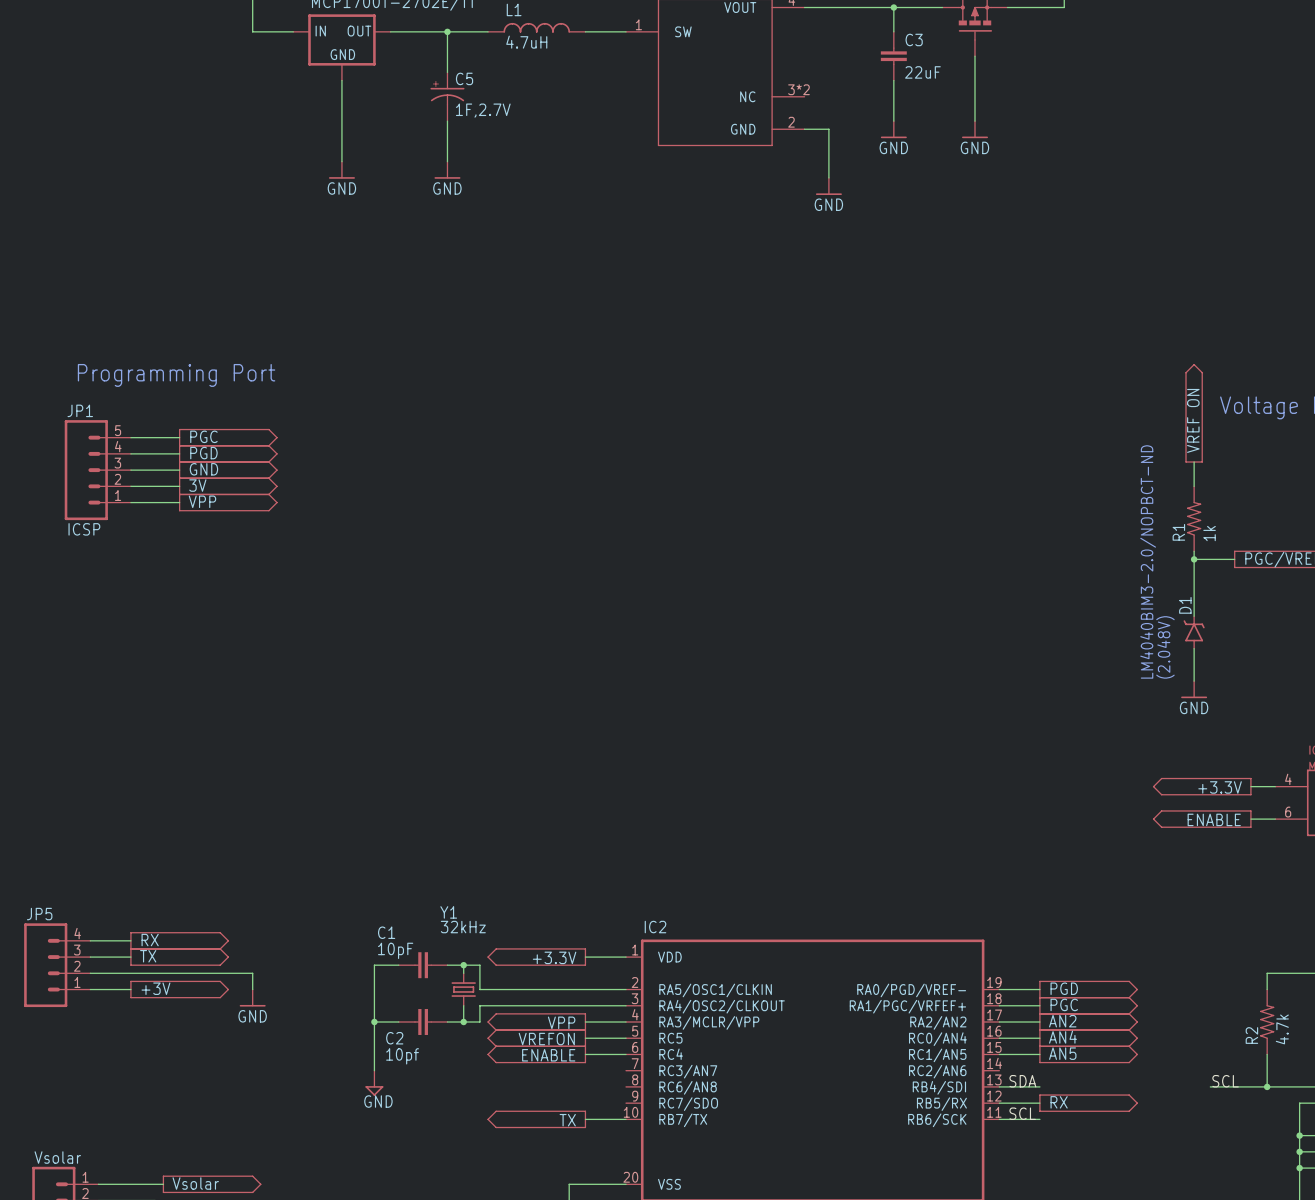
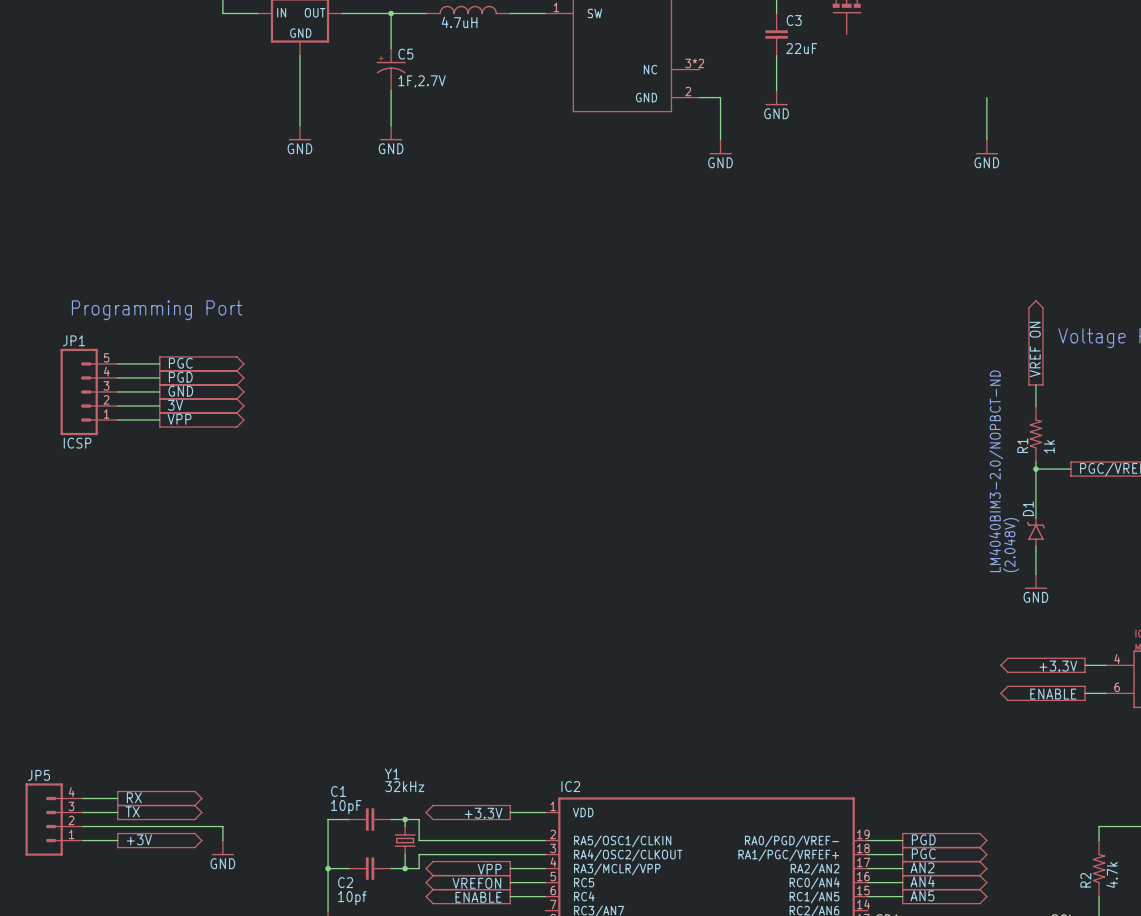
wire: (974, 56) (974, 121) -> none
power symbol: GND (974, 129) -> none
wire: none -> (986, 97) (986, 139)
power symbol: none -> GND (986, 147)

